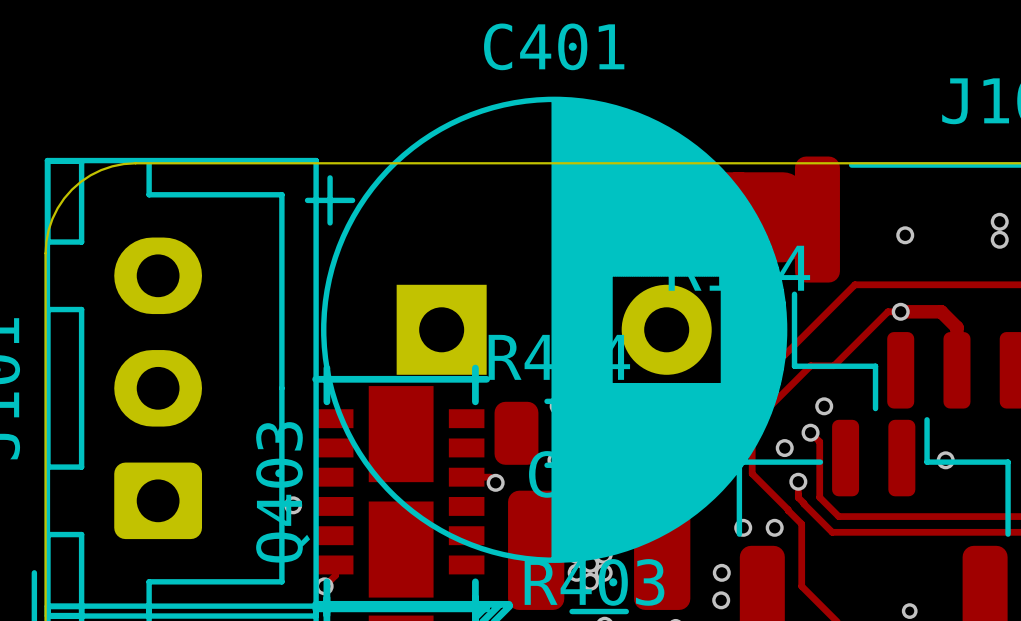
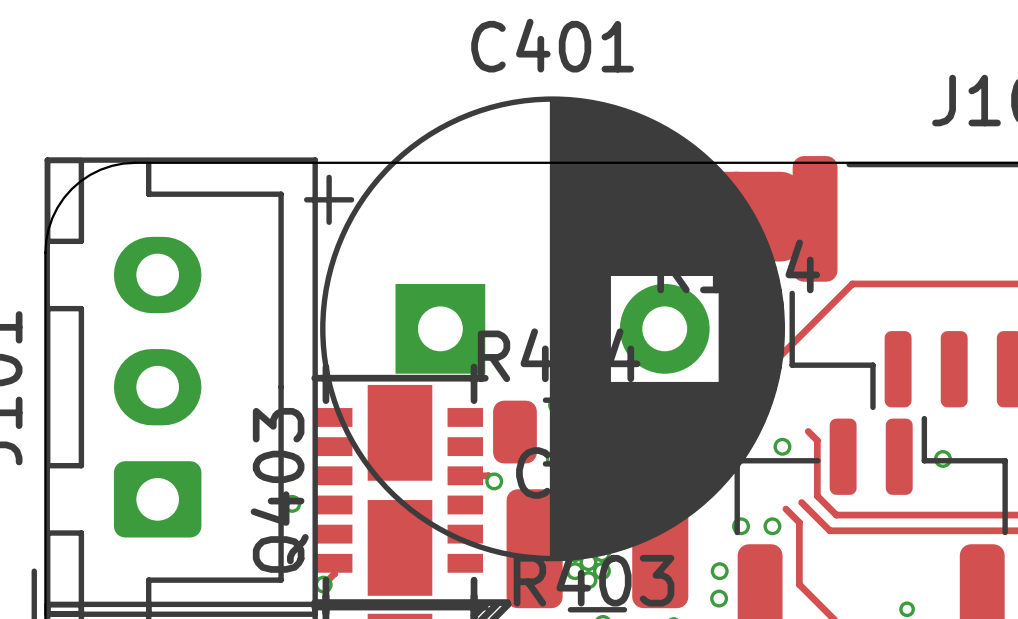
via: (999, 221) -> none
via: (905, 235) -> none
via: (999, 239) -> none
via: (900, 311) -> none
track: (956, 370) (956, 327) (941, 311) (887, 311) (833, 365) (810, 365) (752, 424) (752, 473) (788, 509) -> none
via: (824, 406) -> none
via: (810, 432) -> none
track: (798, 481) (798, 497) (803, 503) -> none
via: (798, 481) -> none

